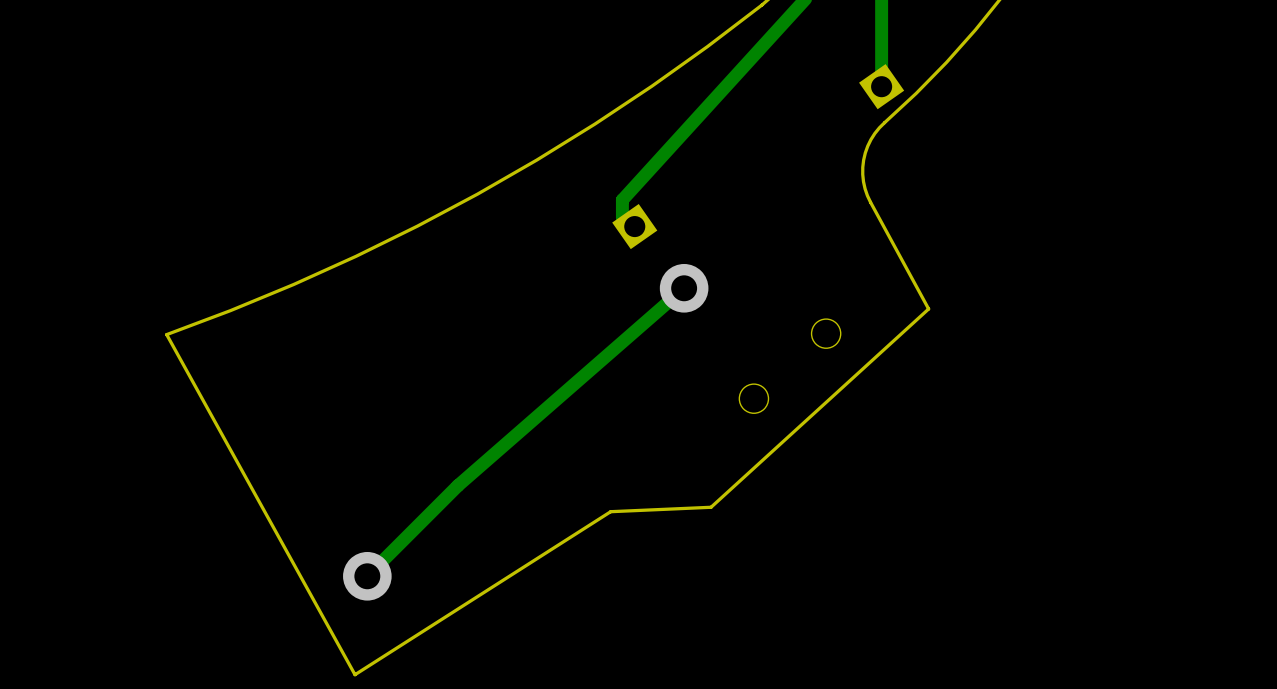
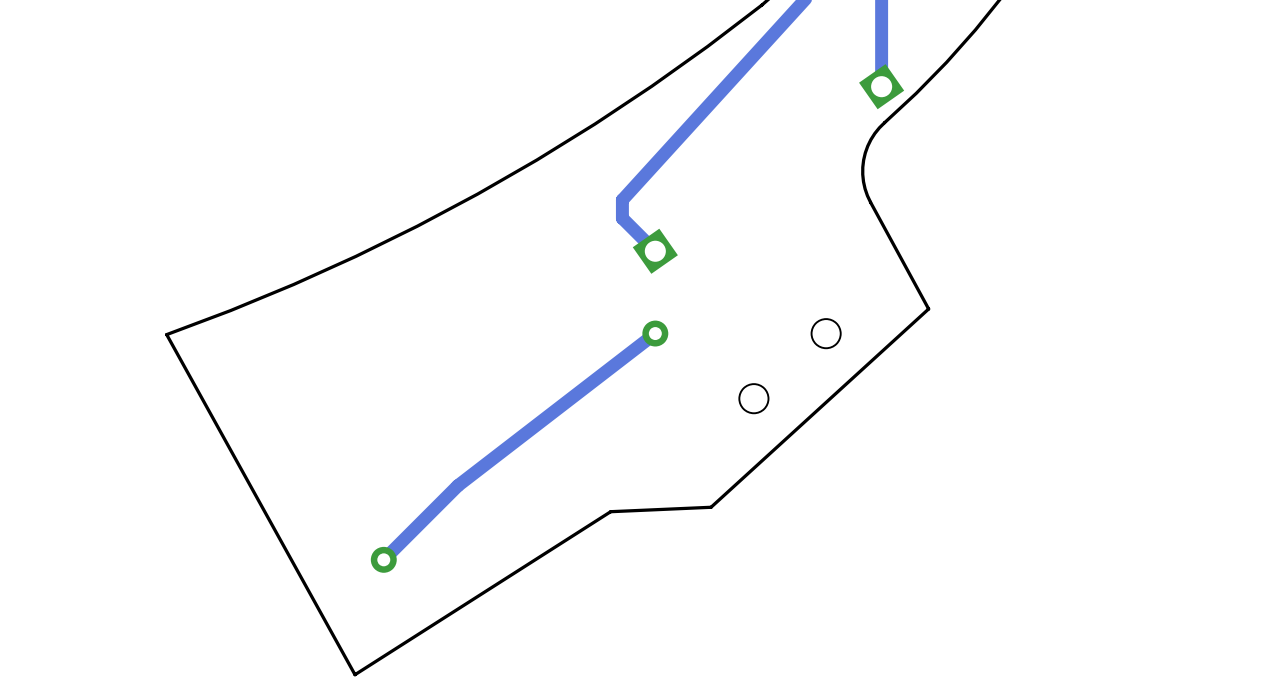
track: none -> (622, 218) (655, 251)
part position: (634, 226) -> (655, 251)
track: (684, 288) (457, 485) -> (655, 333) (457, 485)
via: (684, 288) -> none
via: none -> (655, 333)
via size: [343, 551, 392, 601] -> [370, 546, 397, 573]

